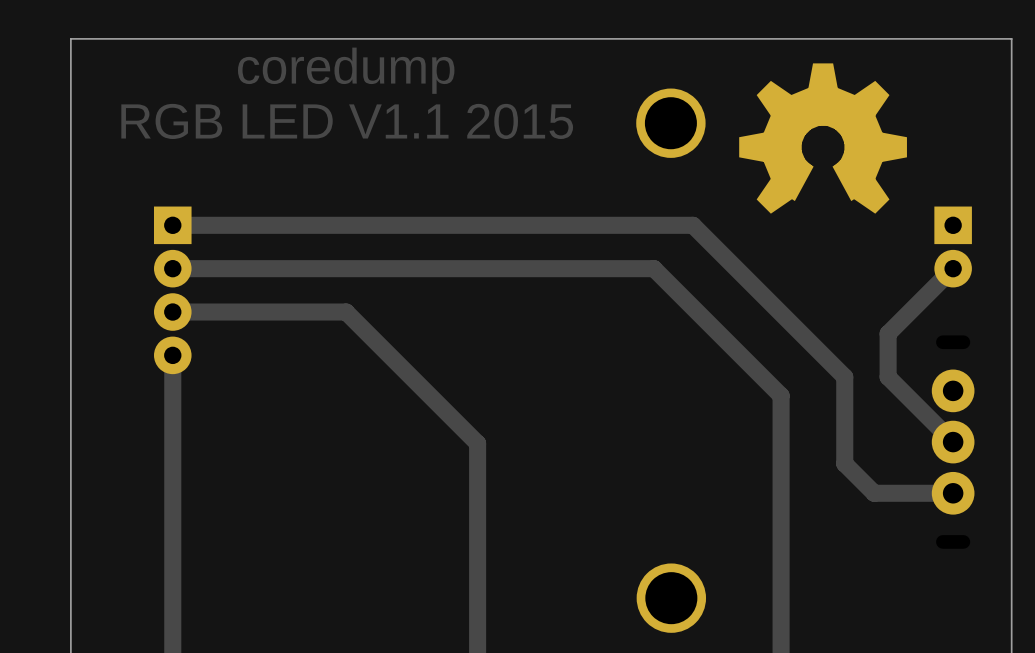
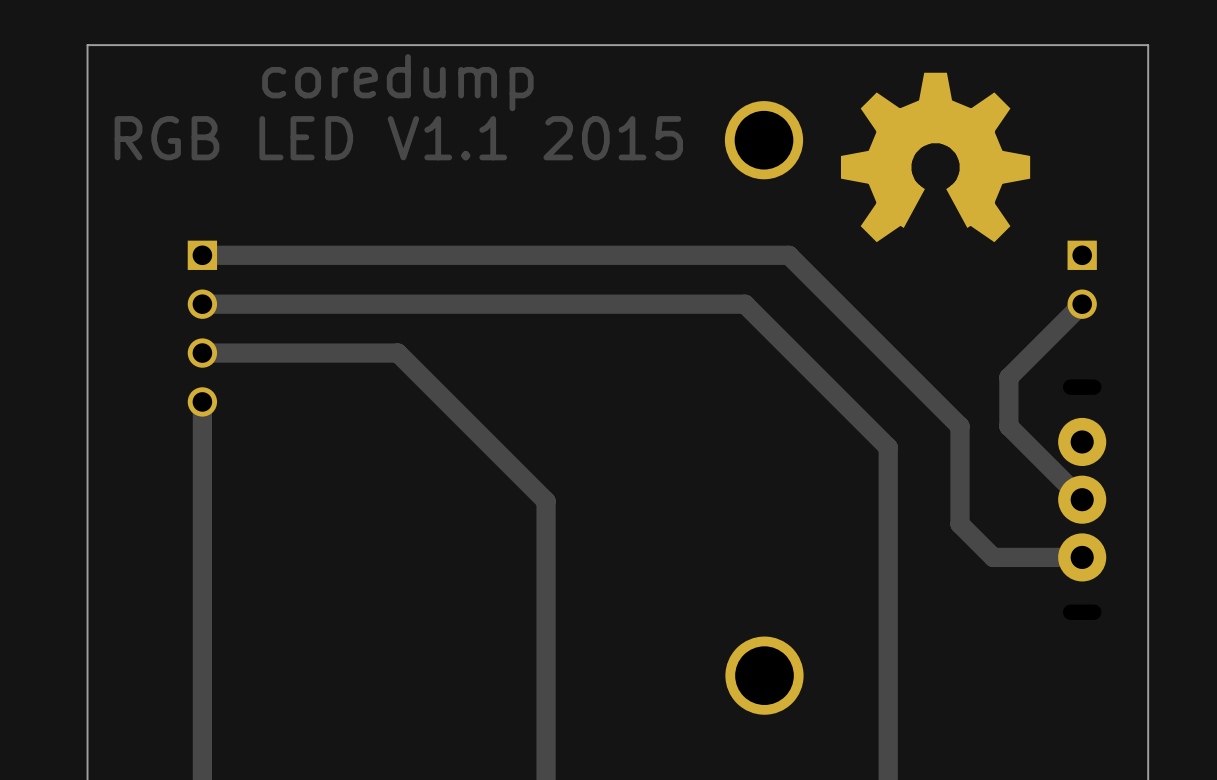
part footprint: [154, 206, 192, 375] -> [187, 240, 218, 417]
part footprint: [934, 206, 972, 288] -> [1067, 240, 1097, 319]

